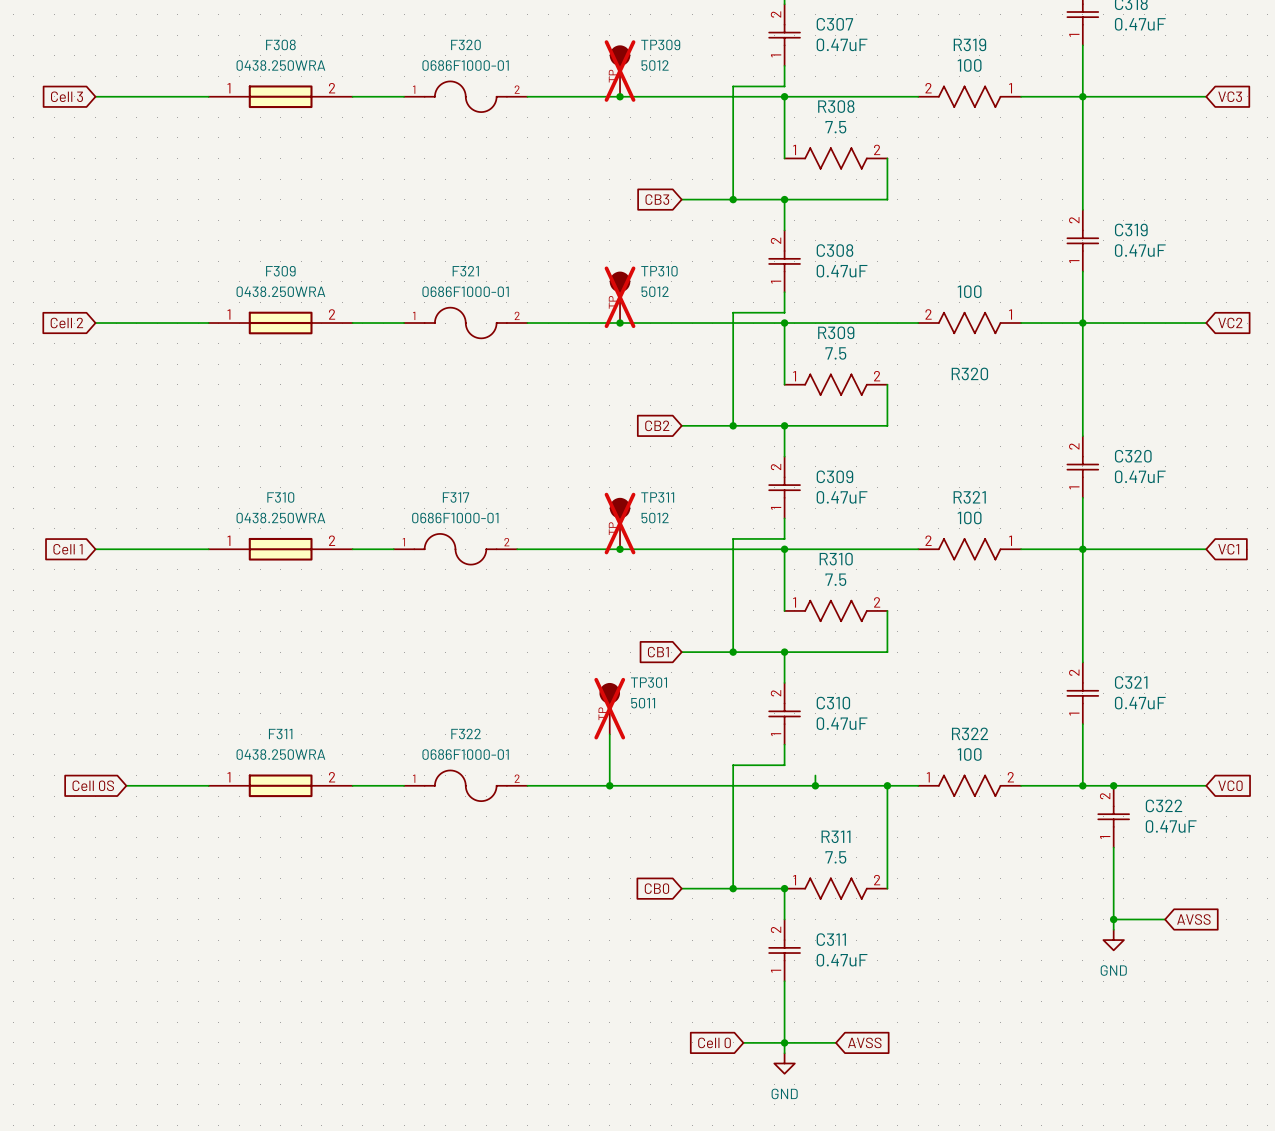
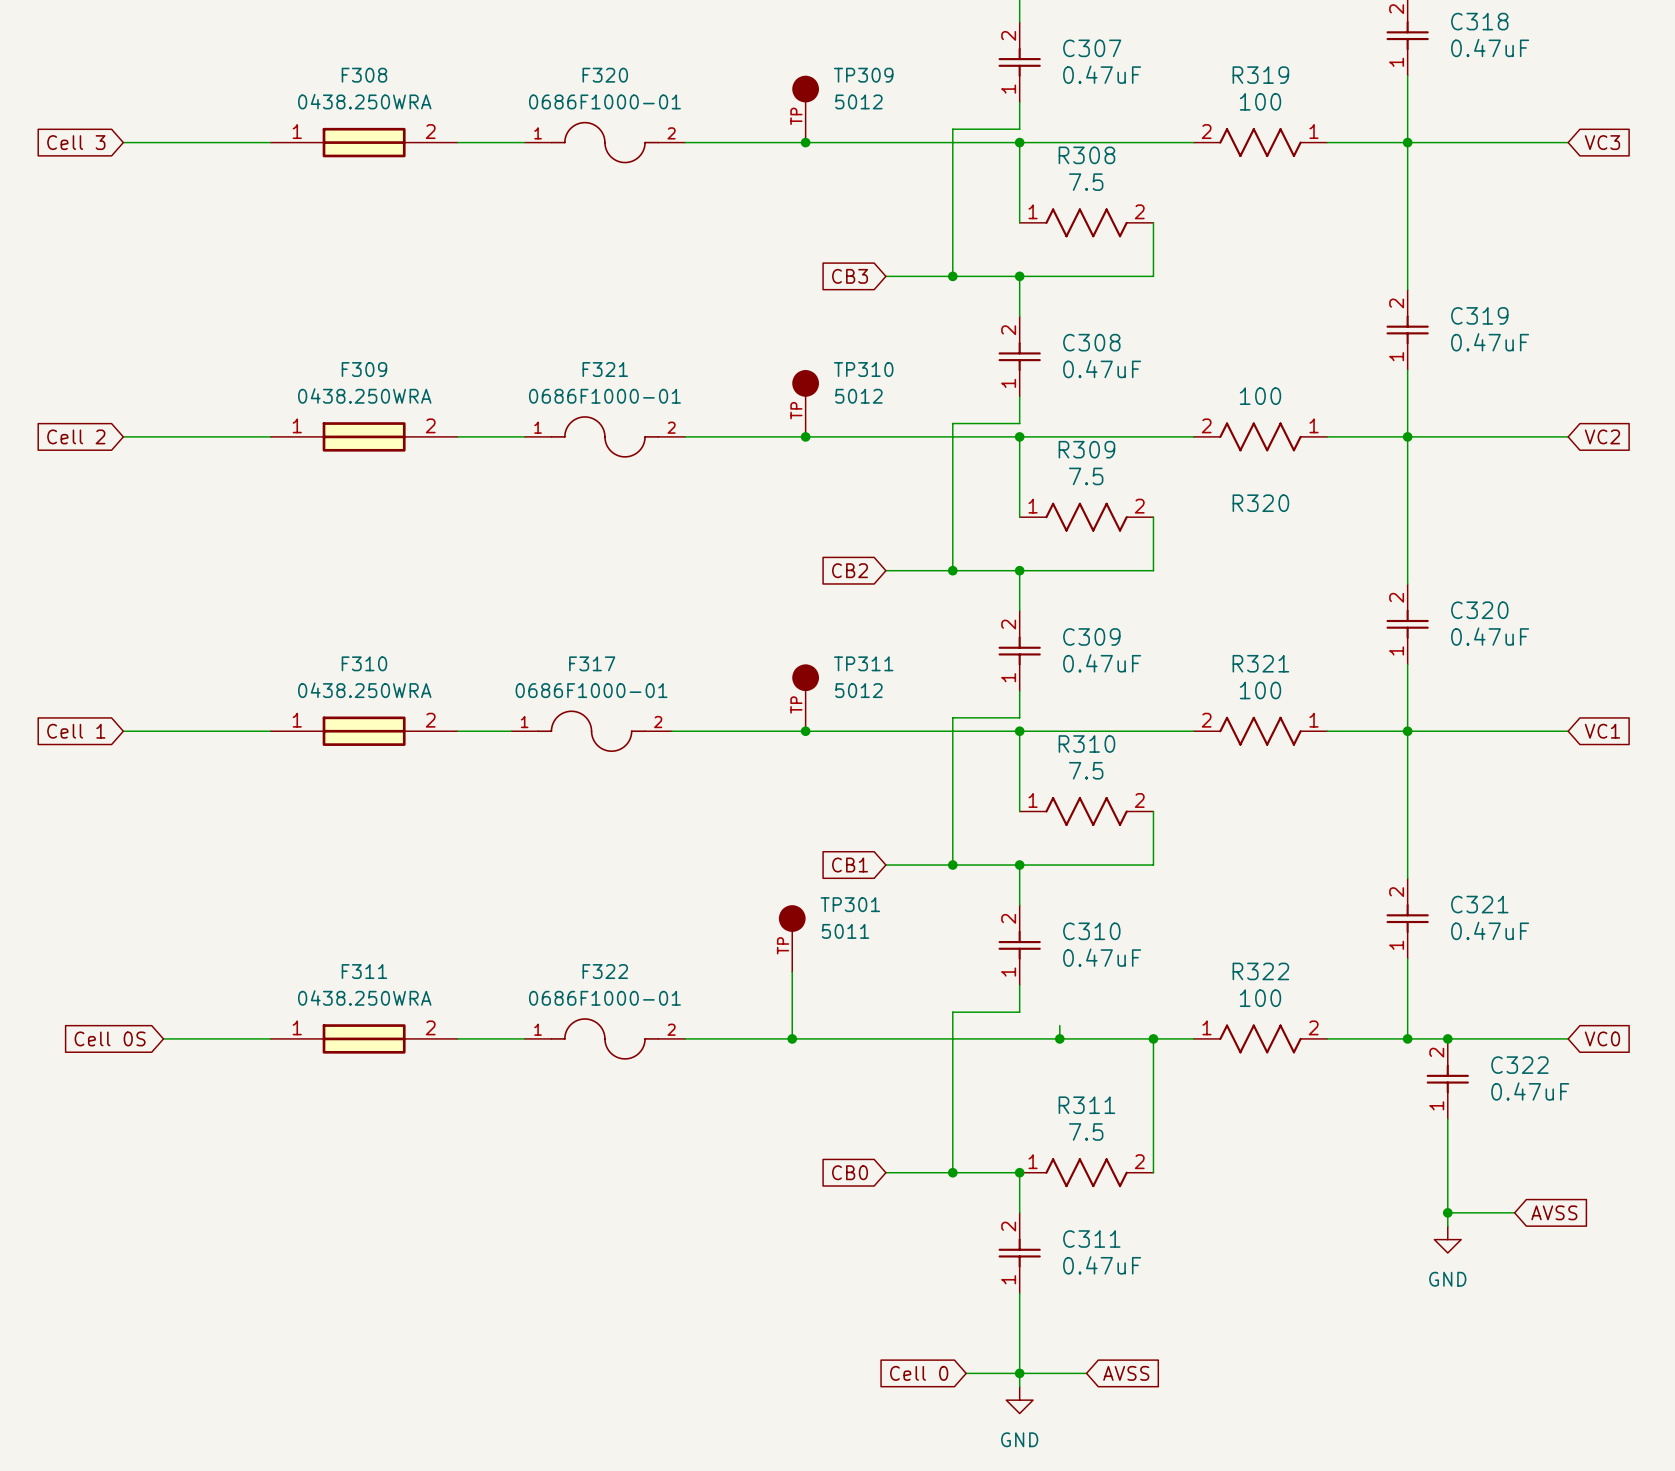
TP309 do-not-place cross: (620, 71) -> none
TP310 do-not-place cross: (620, 297) -> none
TP311 do-not-place cross: (620, 523) -> none
TP301 do-not-place cross: (609, 708) -> none

